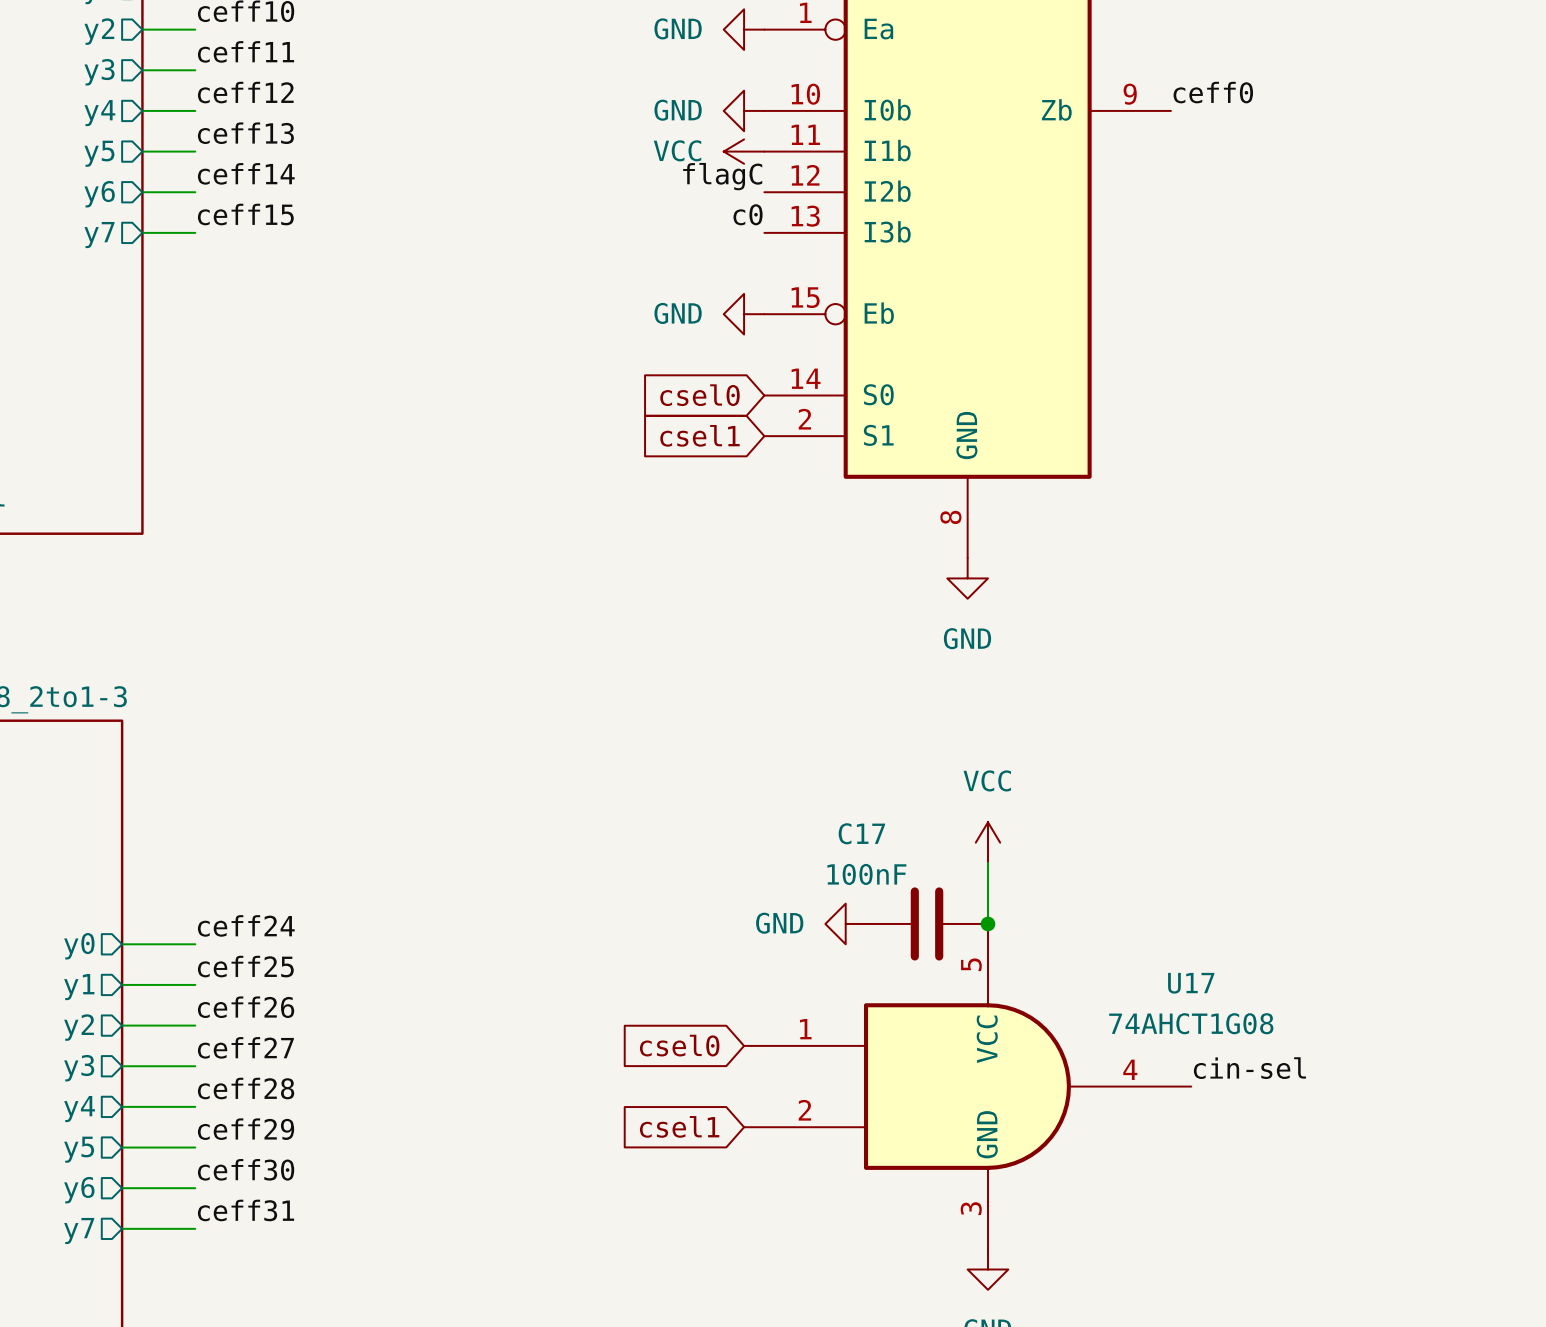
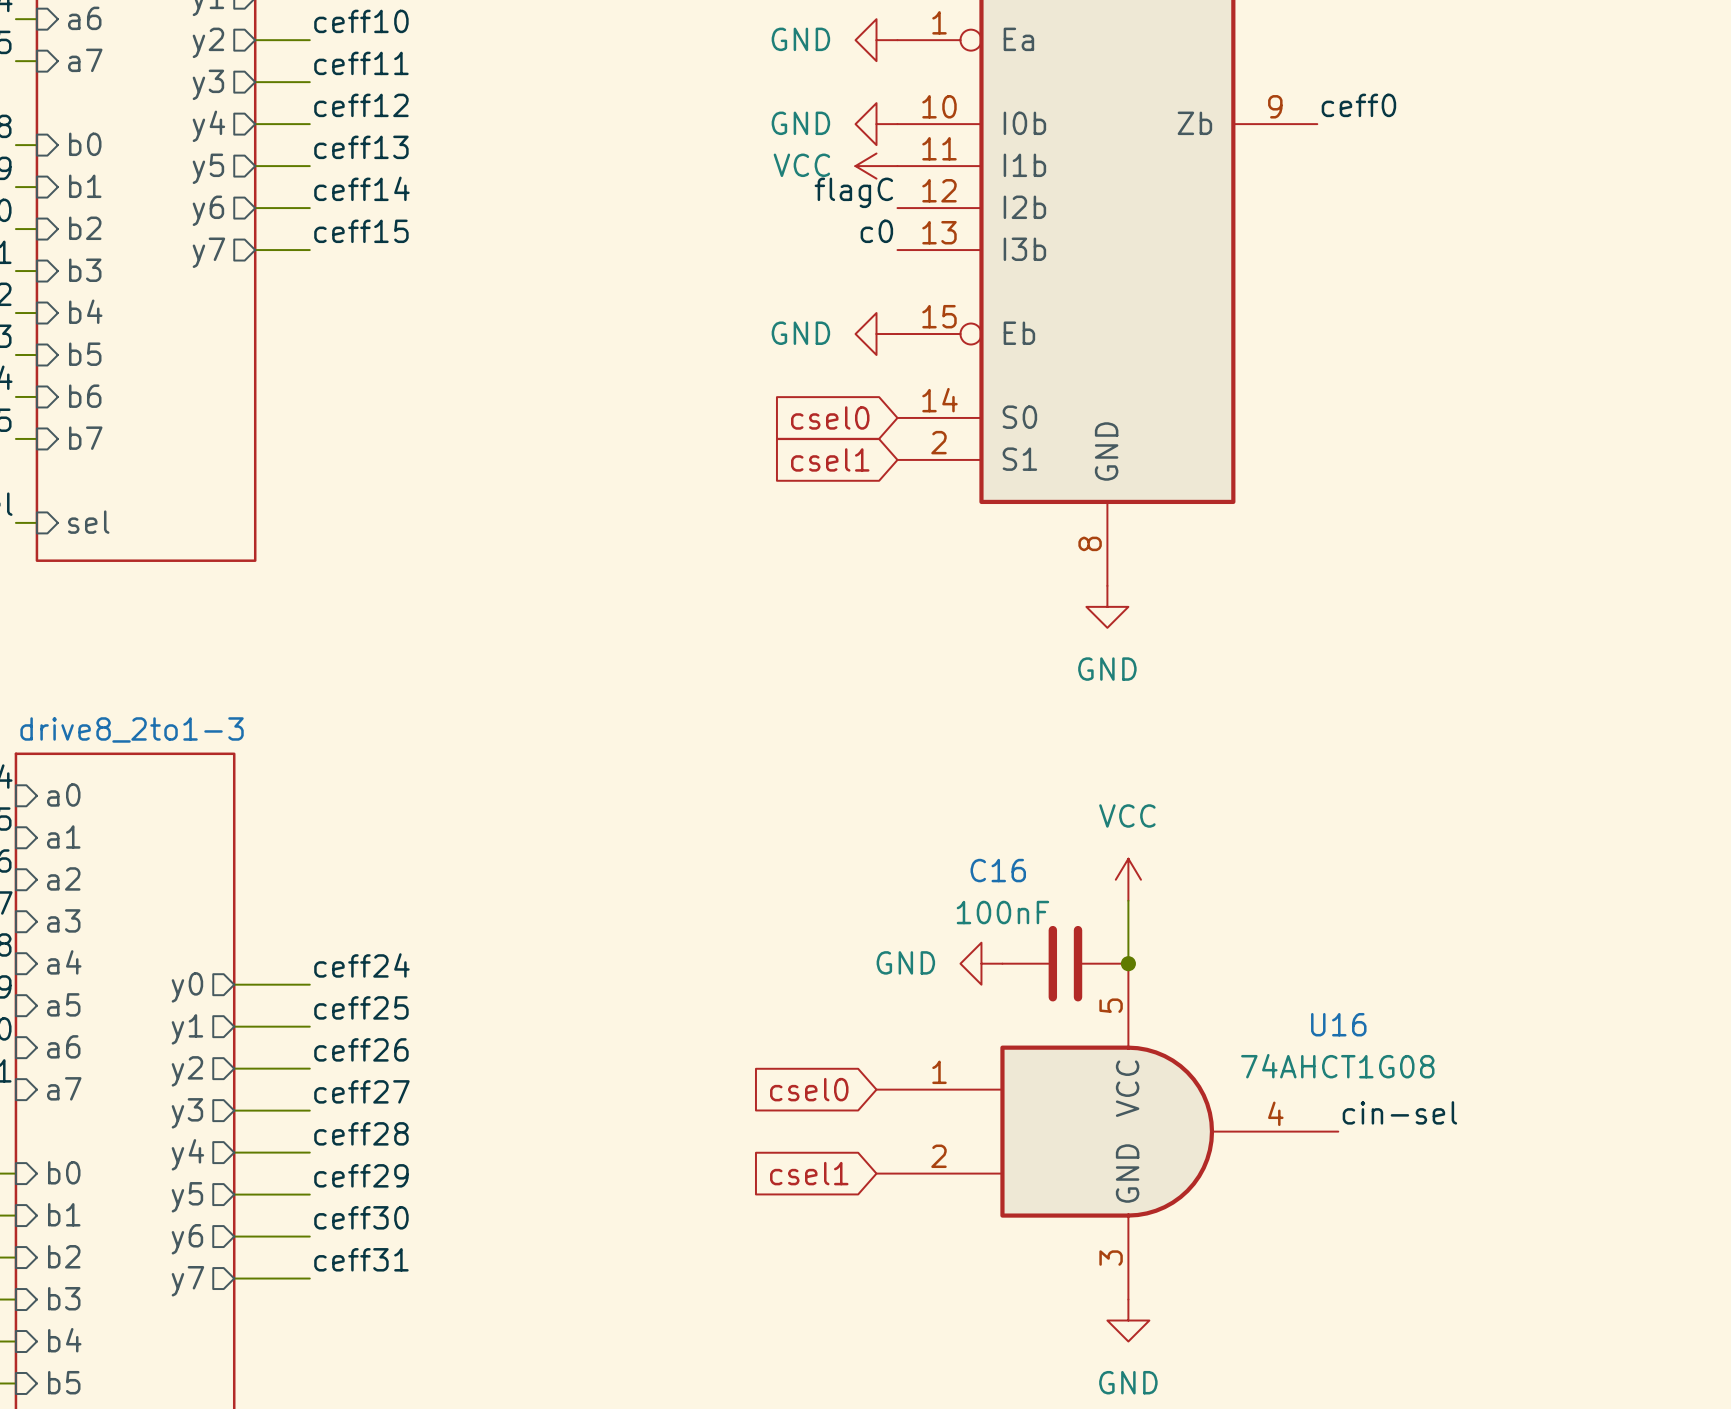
C17 name: C17 (861, 833) -> C16 (998, 870)
U17 name: U17 (1191, 983) -> U16 (1338, 1024)

